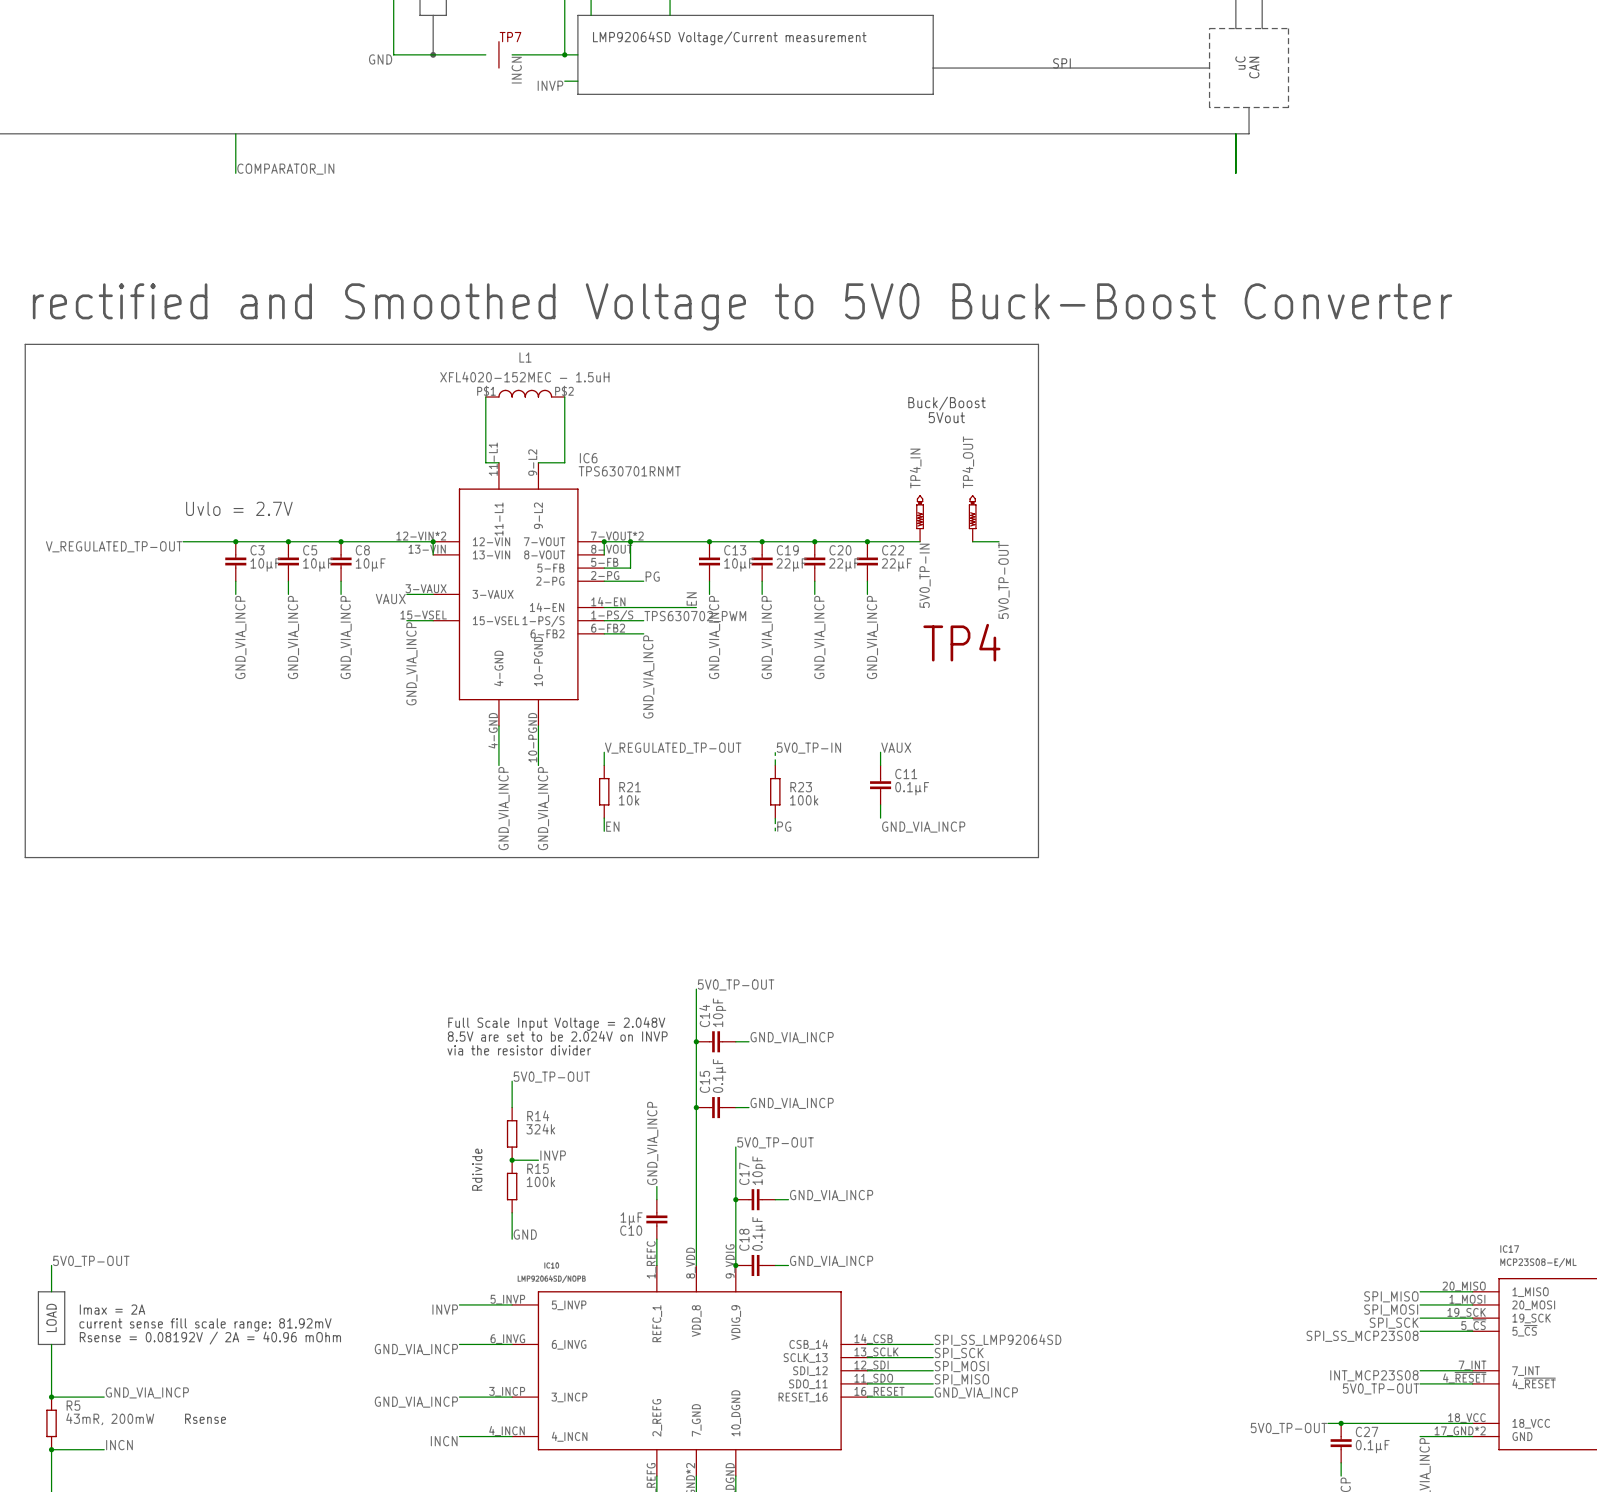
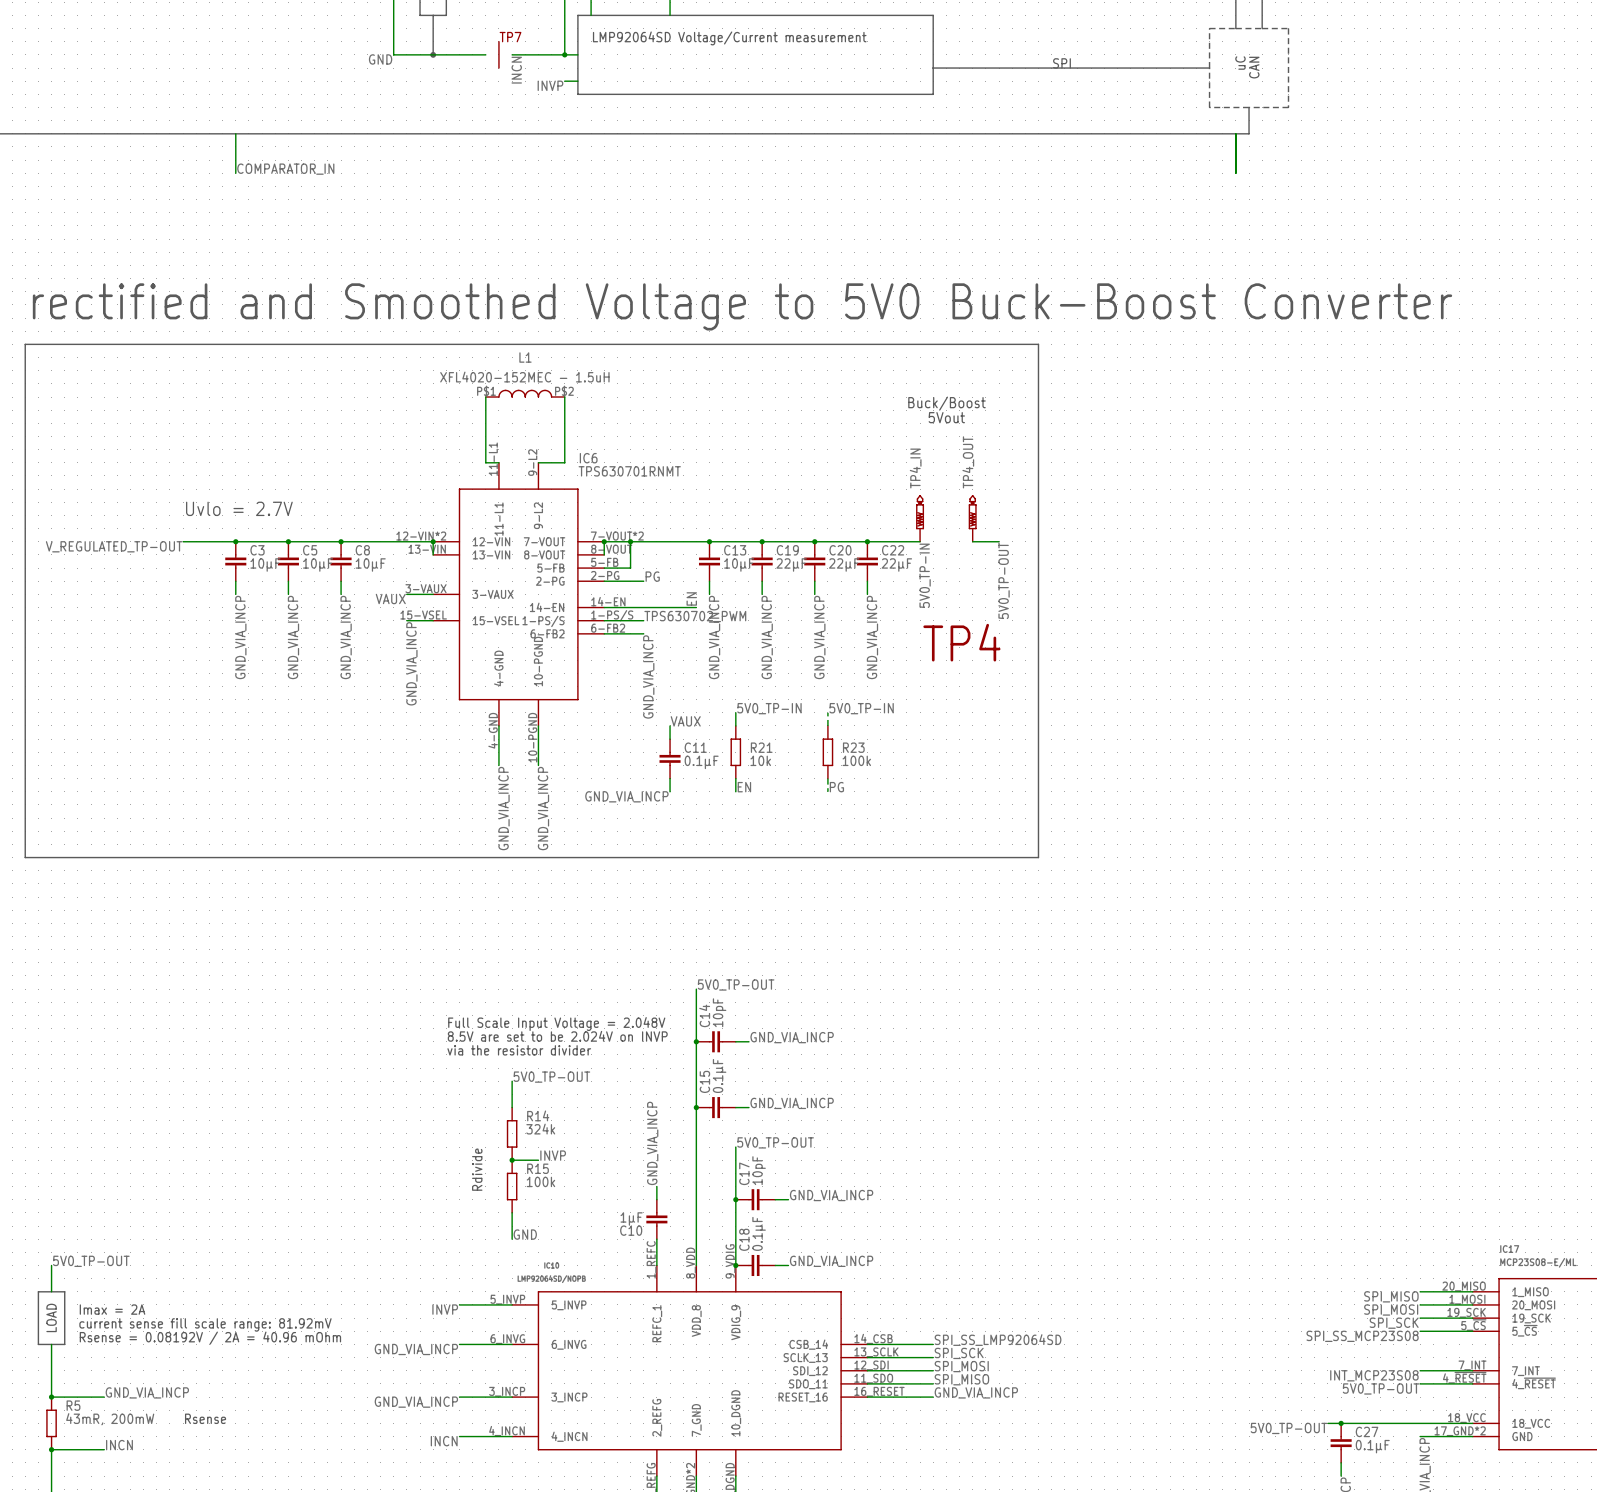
label: none -> 5V0_TP-IN (769, 708)
label: none -> 5V0_TP-IN (861, 708)
label: none -> VAUX (685, 721)
label: VAUX (896, 747) -> none
label: V_REGULATED_TP-OUT (673, 748) -> none
label: 5V0_TP-IN (808, 748) -> none
wire: (604, 752) (604, 765) -> (670, 725) (670, 739)
wire: (775, 752) (775, 765) -> (735, 712) (735, 725)
wire: (880, 752) (880, 765) -> (827, 778) (827, 791)
C11 position: (880, 785) -> (670, 758)
label: none -> EN (744, 787)
R21 position: (604, 791) -> (735, 752)
R23 position: (775, 791) -> (827, 752)
label: none -> GND_VIA_INCP (626, 796)
wire: (880, 804) (880, 818) -> (827, 712) (827, 725)
wire: (604, 818) (604, 831) -> (670, 778) (670, 791)
wire: (775, 818) (775, 831) -> (735, 778) (735, 791)
label: EN (612, 826) -> none
label position: PG (784, 826) -> PG (836, 787)
label: GND_VIA_INCP (923, 827) -> none

